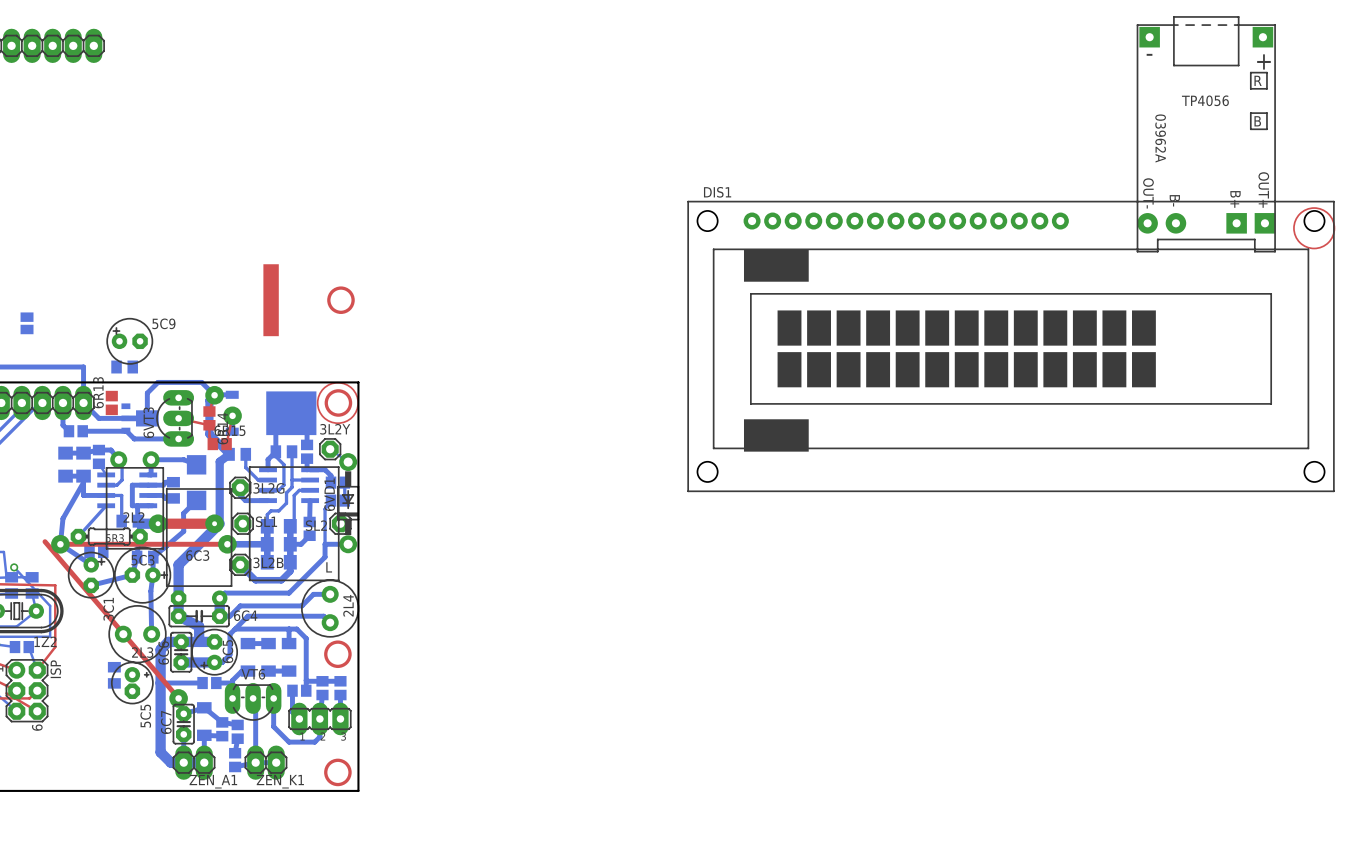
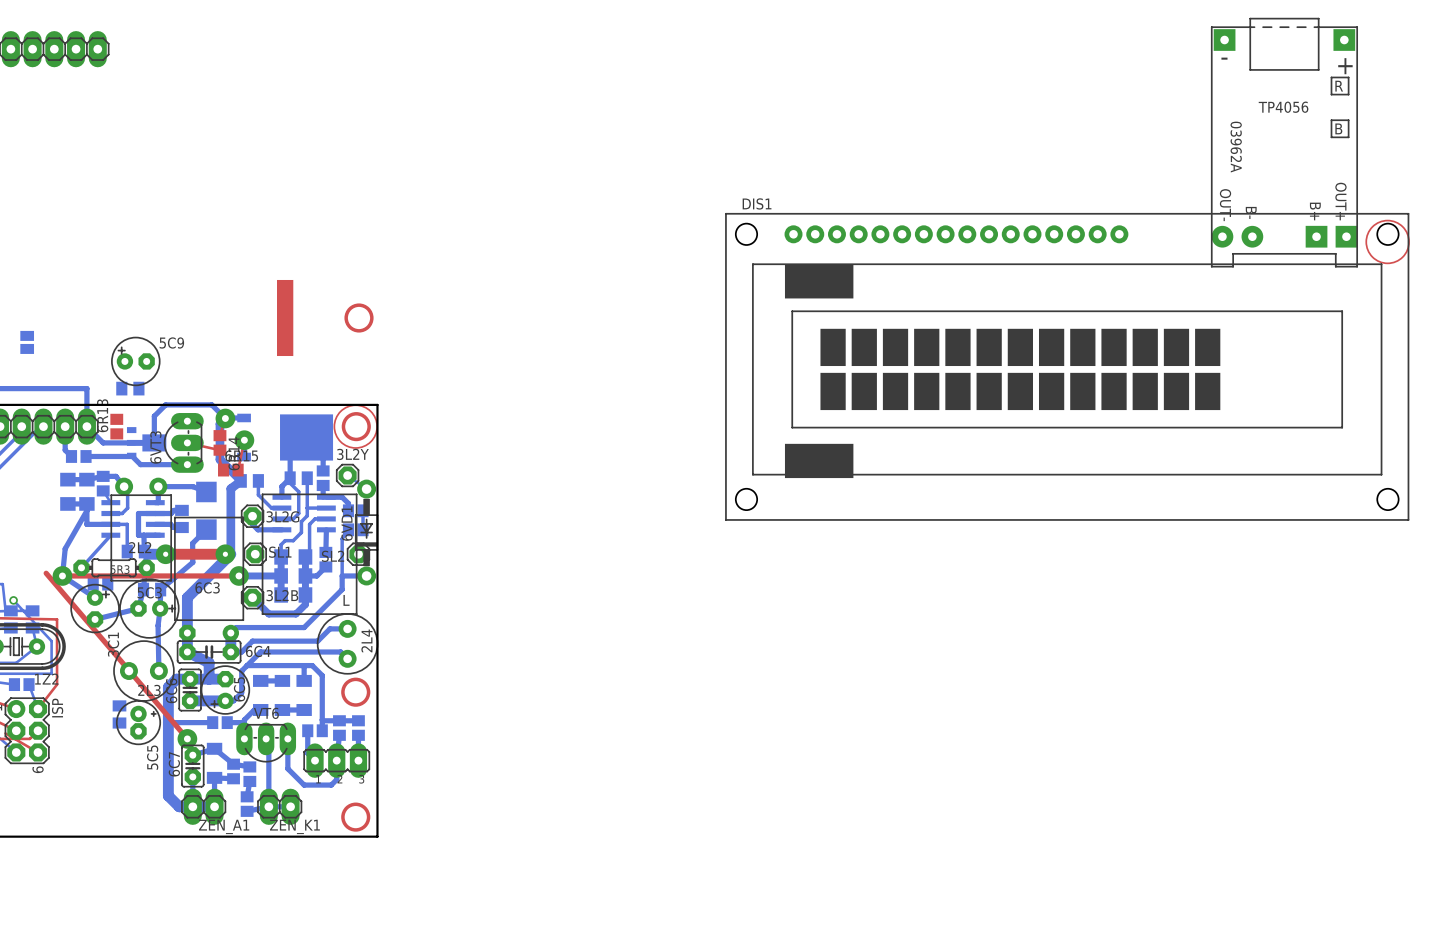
part: (1206, 134) -> none
part: none -> (1284, 142)

